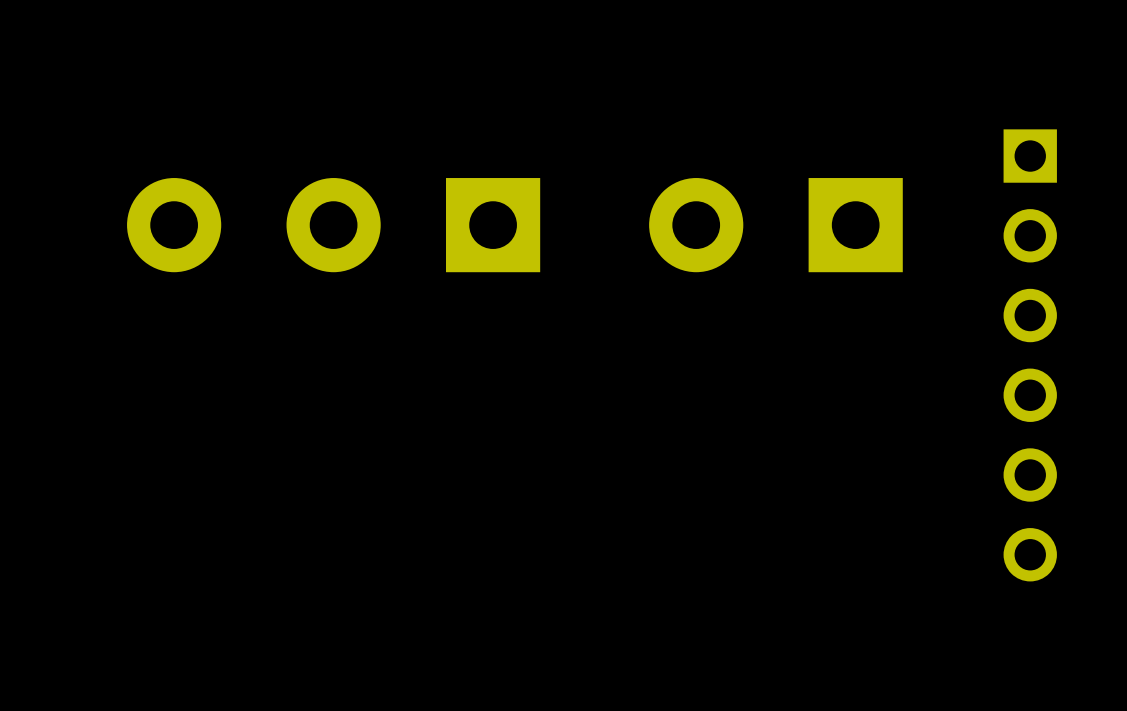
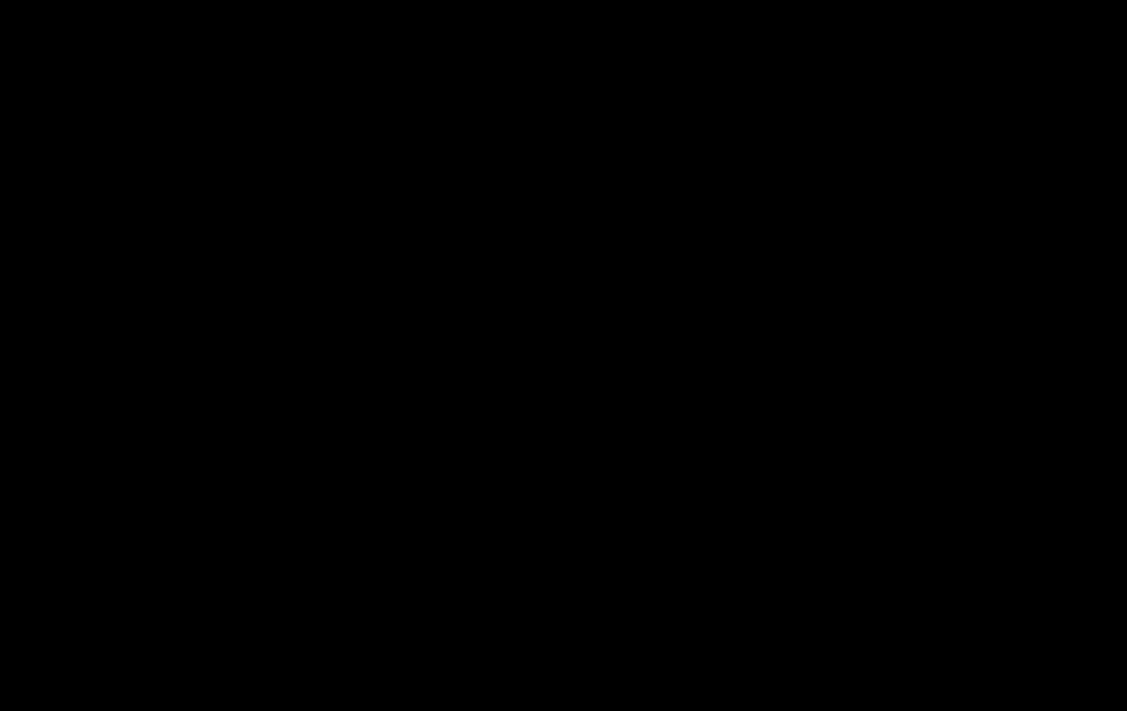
part: (333, 225) -> none
part: (775, 225) -> none
part: (1030, 355) -> none

